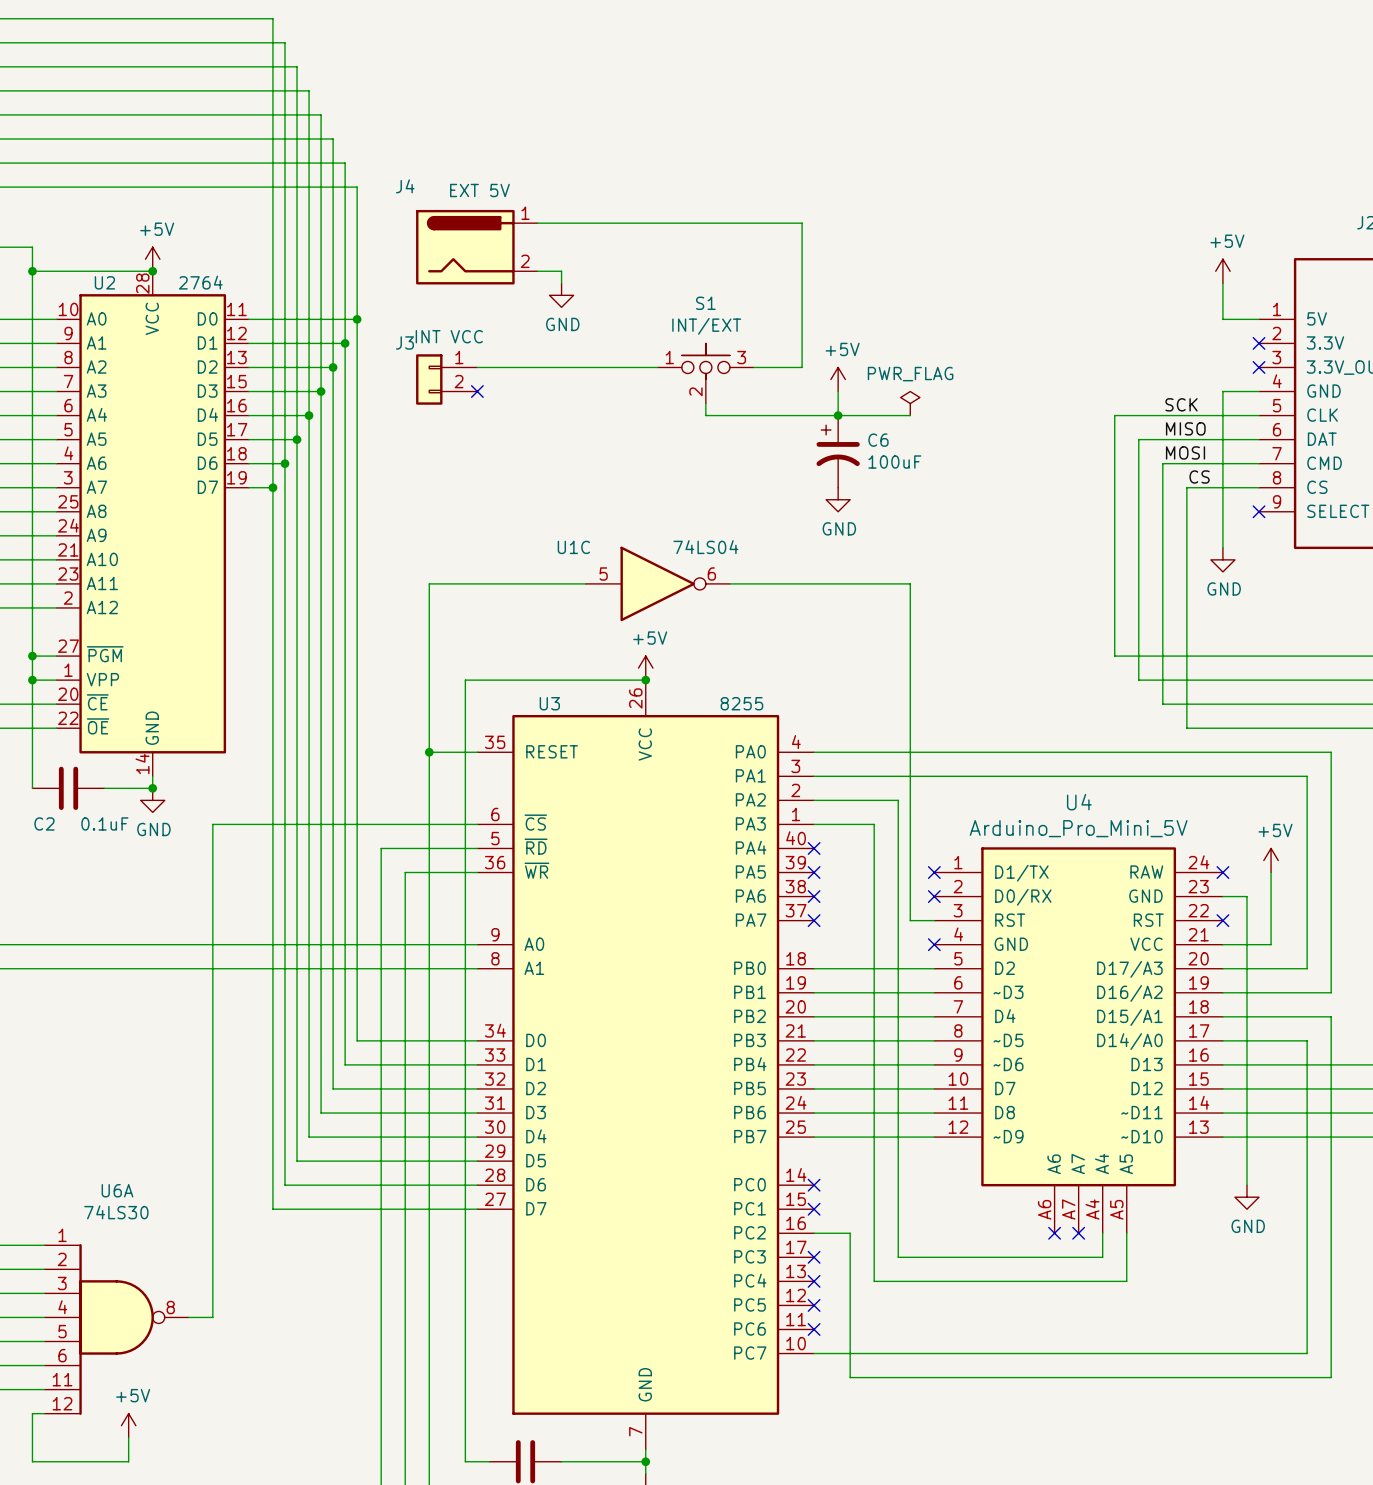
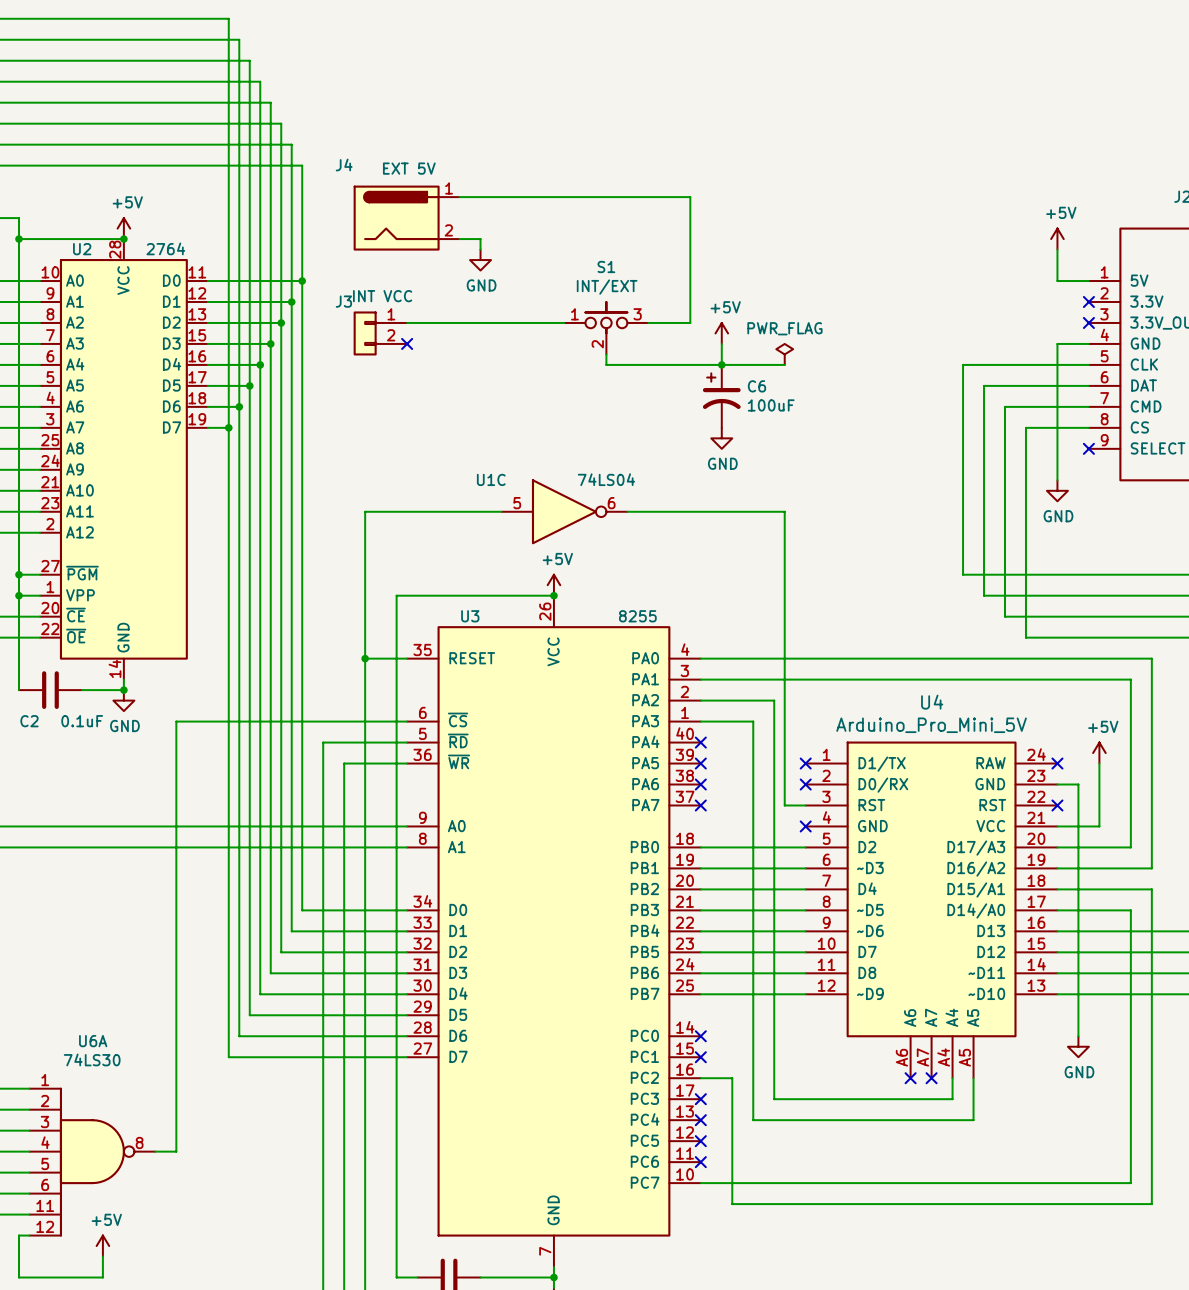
label: SCK (1181, 404) -> none
label: MISO (1185, 428) -> none
label: MOSI (1185, 452) -> none
label: CS (1199, 476) -> none

